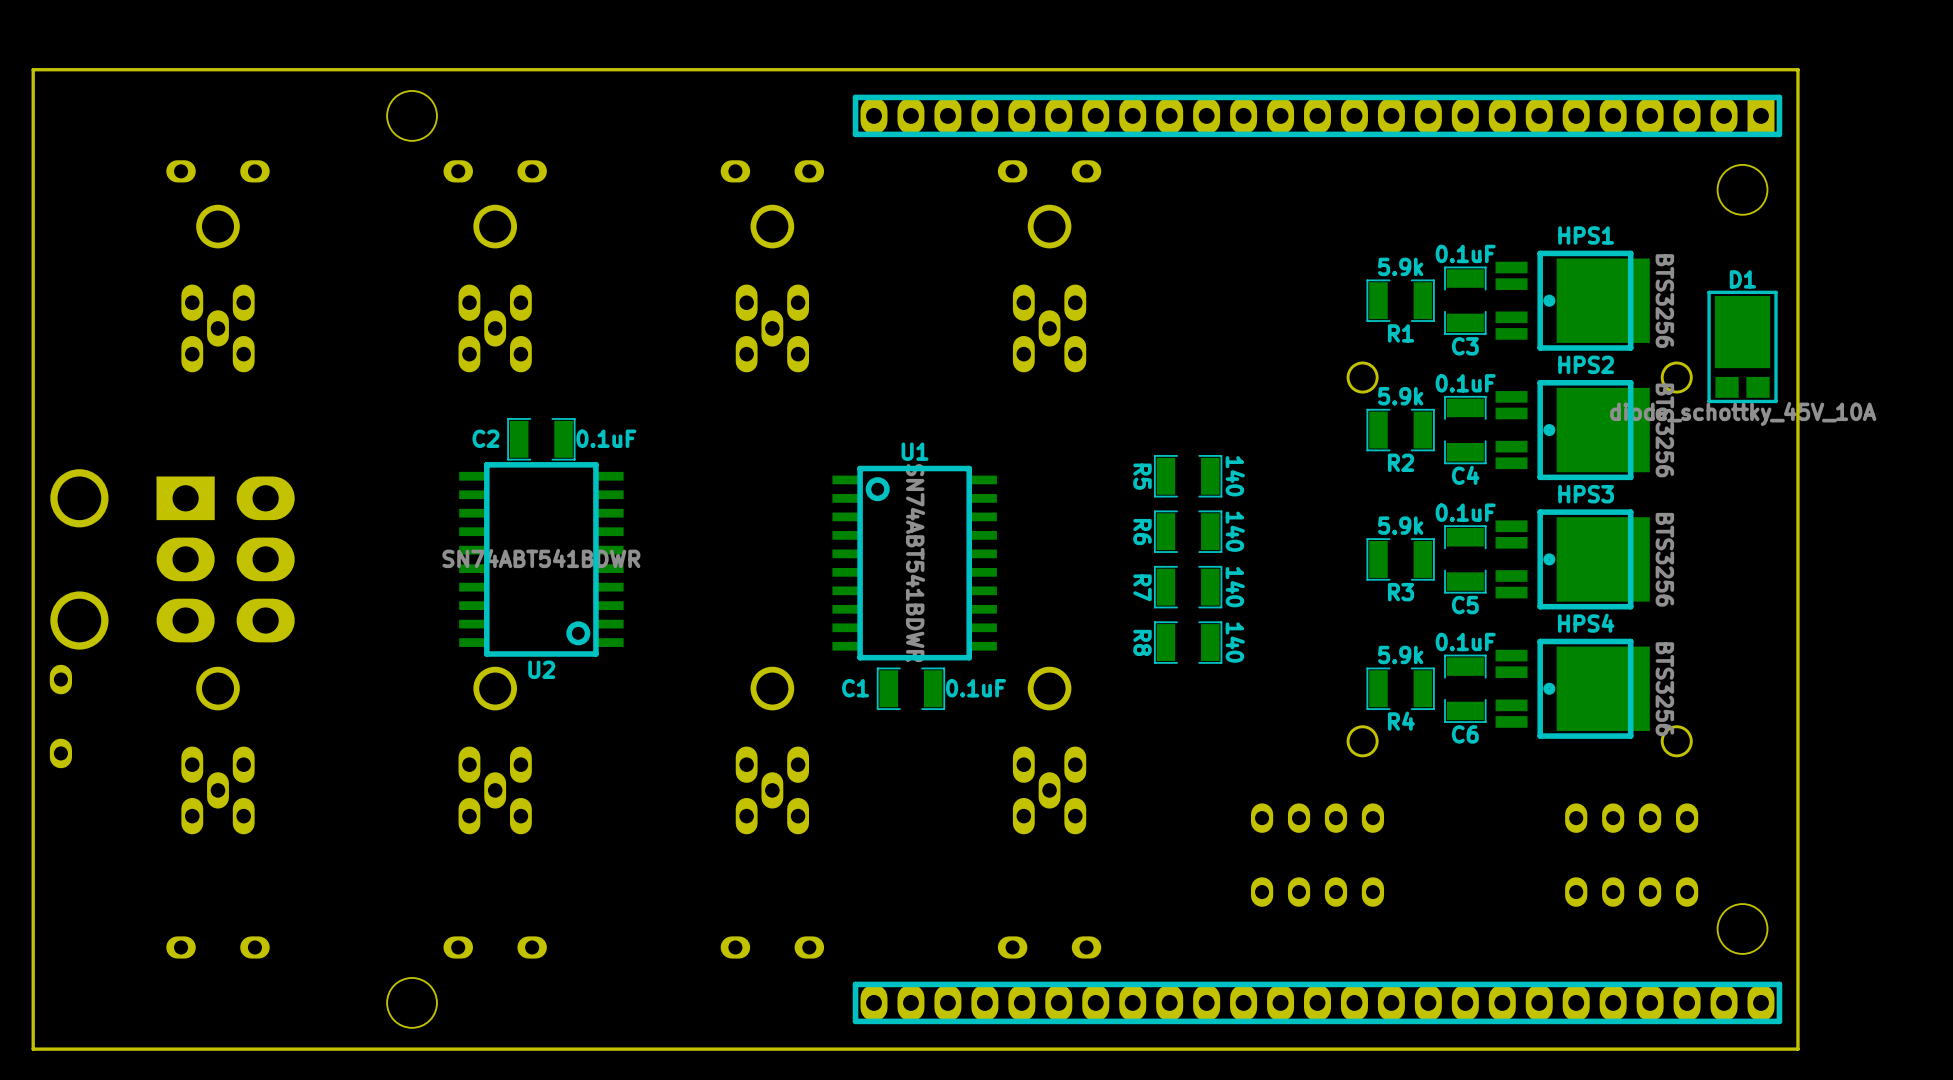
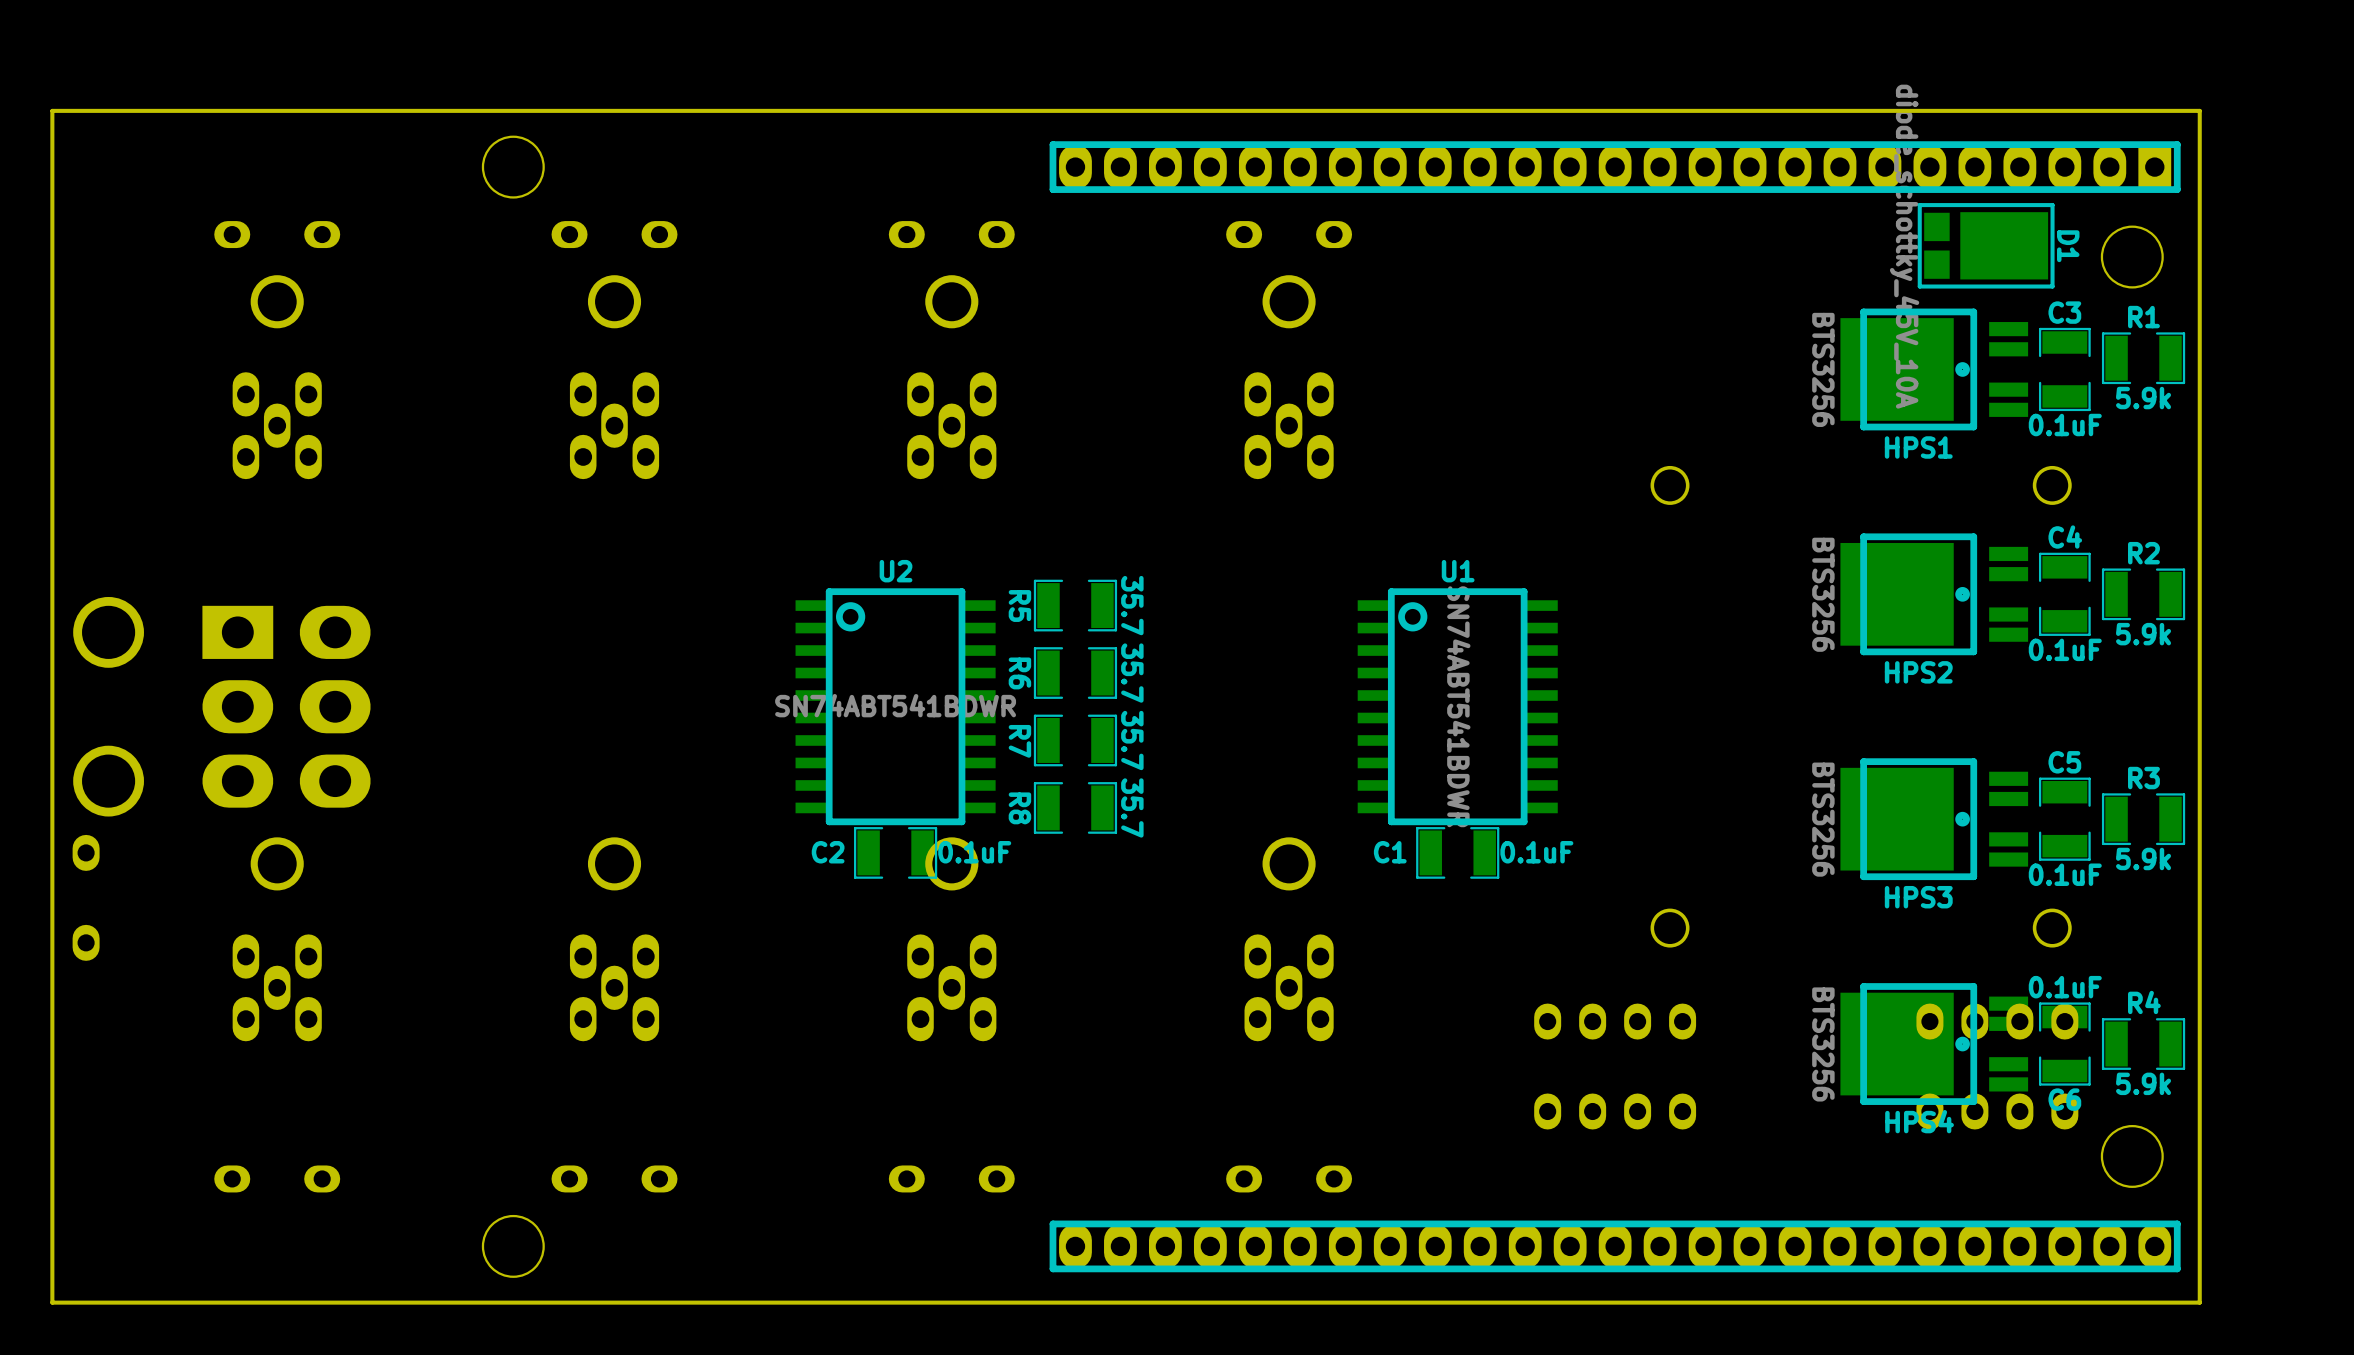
C3 value position: 0.1uF (1465, 253) -> 0.1uF (2065, 425)
R1 value position: 5.9k (1400, 266) -> 5.9k (2143, 398)
R1 position: (1400, 300) -> (2143, 358)
C3 position: (1465, 300) -> (2064, 369)
HPS1 rotation: 0° (1572, 300) -> 180° (1934, 369)
R1 name position: R1 (1401, 333) -> R1 (2143, 317)
C3 name position: C3 (1465, 346) -> C3 (2064, 312)
D1 rotation: 0° (1742, 346) -> 90° clockwise (1986, 245)
D1 position: (1742, 346) -> (1986, 245)
C4 value position: 0.1uF (1465, 383) -> 0.1uF (2065, 649)
R2 value position: 5.9k (1400, 396) -> 5.9k (2143, 634)
R2 position: (1400, 430) -> (2143, 594)
C4 position: (1465, 430) -> (2064, 594)
HPS2 rotation: 0° (1572, 430) -> 180° (1934, 594)
C2 position: (541, 439) -> (895, 852)
R2 name position: R2 (1401, 462) -> R2 (2143, 553)
C4 name position: C4 (1465, 475) -> C4 (2065, 537)
R5 position: (1188, 476) -> (1075, 605)
R5 value: 140 (1235, 476) -> 35.7 (1132, 605)
C5 value position: 0.1uF (1465, 512) -> 0.1uF (2065, 874)
R3 value position: 5.9k (1400, 525) -> 5.9k (2143, 858)
R6 position: (1188, 531) -> (1075, 673)
R6 value: 140 (1235, 531) -> 35.7 (1132, 673)
U2 rotation: 0° (541, 559) -> 180° (895, 706)
U2 position: (541, 559) -> (895, 706)
R3 position: (1400, 559) -> (2143, 819)
C5 position: (1465, 559) -> (2064, 819)
HPS3 rotation: 0° (1572, 559) -> 180° (1934, 819)
HPS3 position: (1572, 559) -> (1934, 819)
U1 position: (914, 563) -> (1457, 706)
R7 position: (1188, 587) -> (1075, 740)
R7 value: 140 (1235, 587) -> 35.7 (1132, 740)
R3 name position: R3 (1401, 592) -> R3 (2143, 778)
C5 name position: C5 (1465, 605) -> C5 (2064, 762)
R8 position: (1188, 642) -> (1075, 807)
R8 value: 140 (1235, 642) -> 35.7 (1132, 807)
R4 value position: 5.9k (1400, 654) -> 5.9k (2143, 1083)
C1 position: (910, 688) -> (1457, 852)
R4 position: (1400, 688) -> (2143, 1044)
C6 position: (1465, 688) -> (2064, 1044)
HPS4 rotation: 0° (1572, 688) -> 180° (1934, 1044)
HPS4 position: (1572, 688) -> (1934, 1044)
R4 name position: R4 (1401, 721) -> R4 (2144, 1002)

